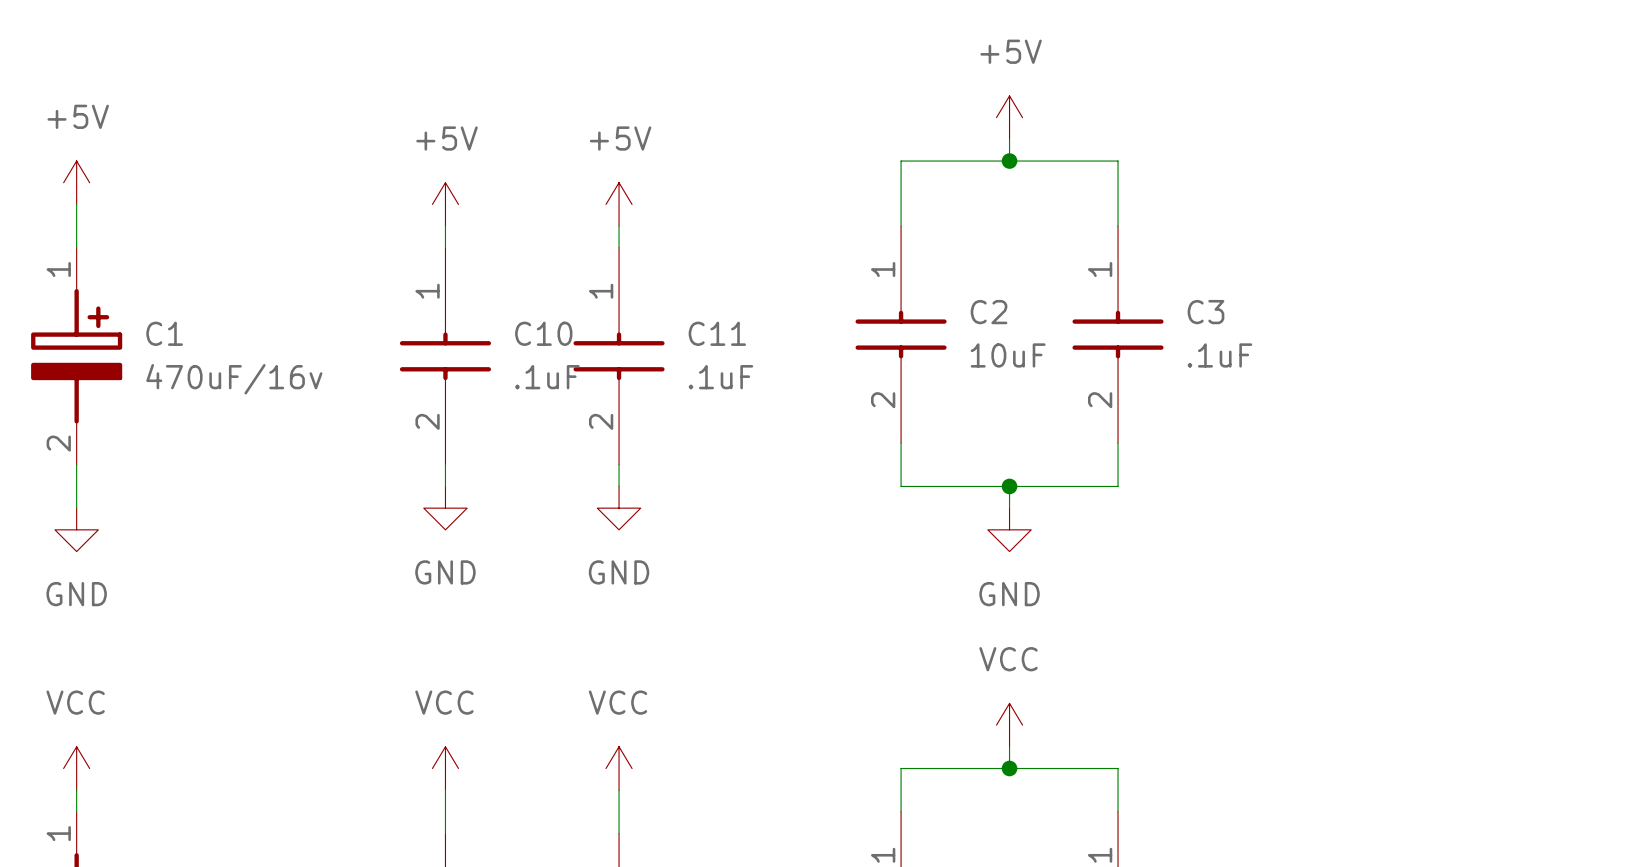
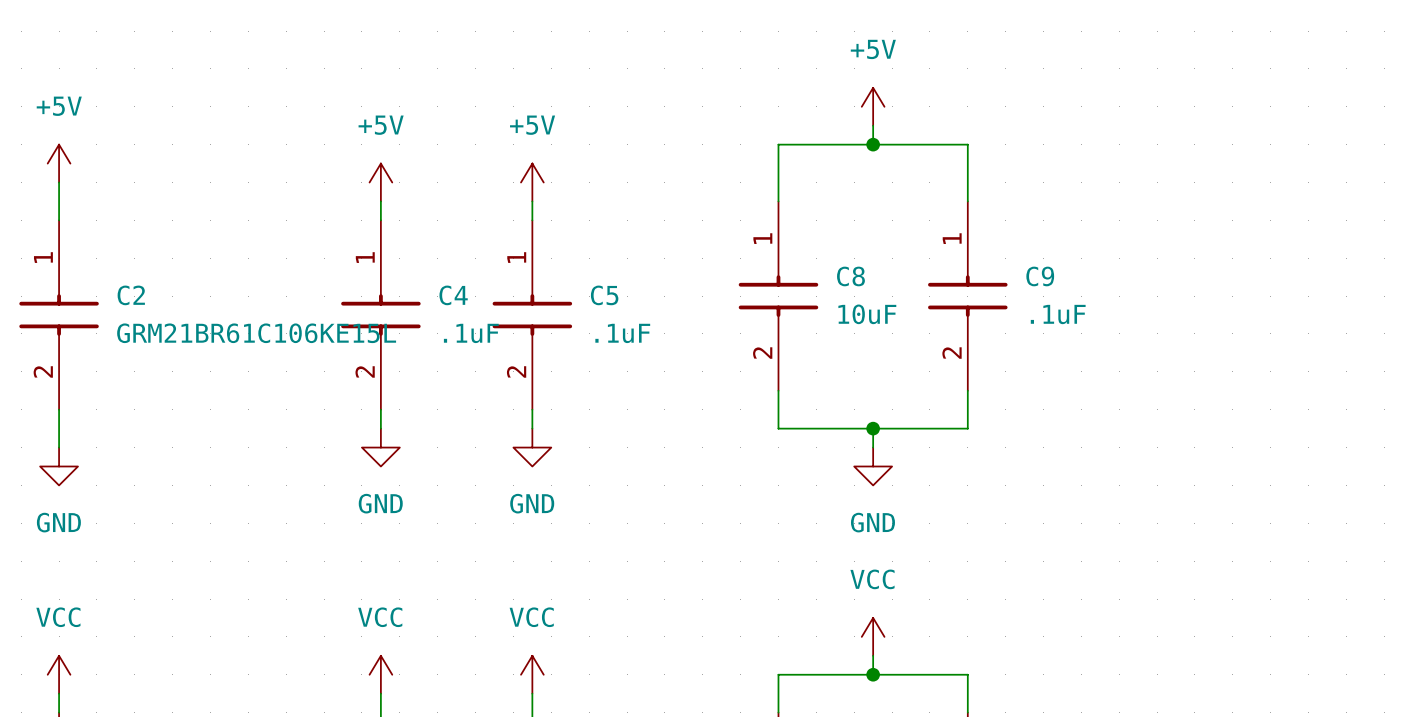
C2 name: C2 (989, 312) -> C8 (850, 276)
C3 name: C3 (1205, 312) -> C9 (1040, 276)
C10 name: C10 (543, 333) -> C4 (453, 295)
C11 name: C11 (717, 333) -> C5 (604, 295)
C1: 470uF/16v (76, 356) -> none
C2: none -> GRM21BR61C106KE15L (59, 315)

